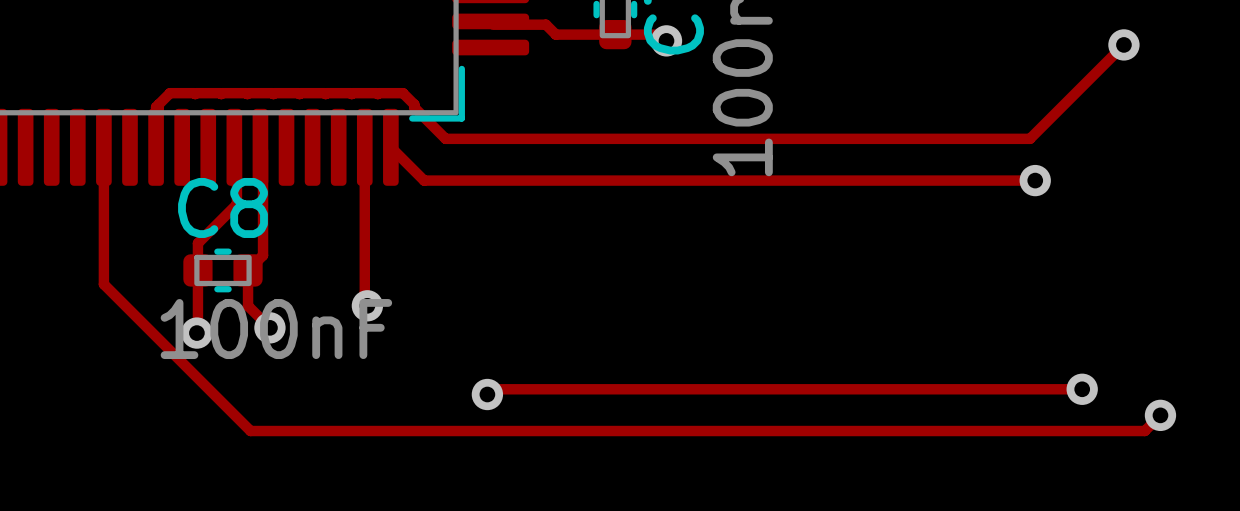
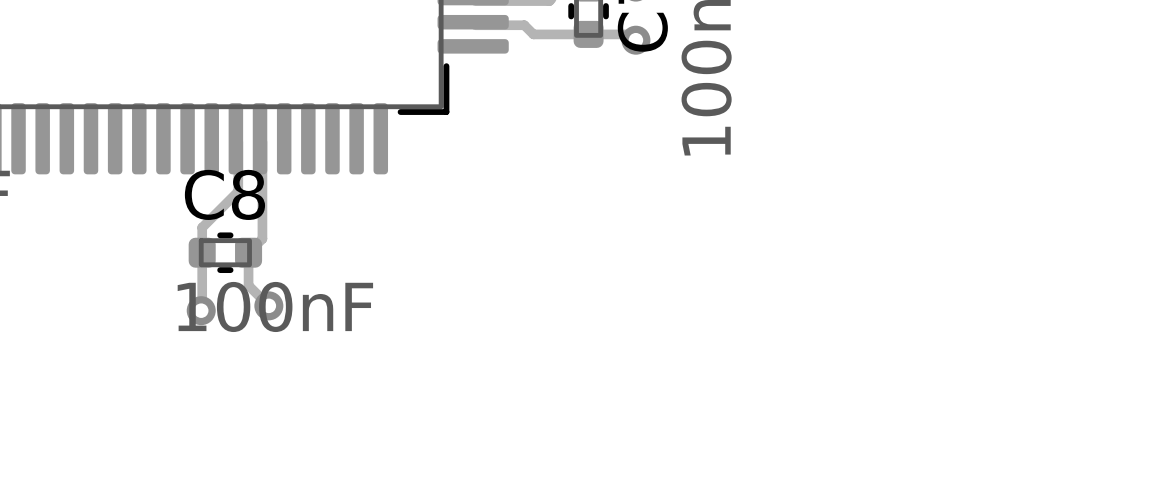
track: (1123, 44) (1030, 138) (445, 138) (414, 107) (414, 104) (402, 93) (170, 93) (158, 104) (158, 109) (156, 107) (156, 147) -> none
via: (1123, 44) -> none
track: (103, 147) (103, 284) (250, 431) (1144, 431) (1160, 415) -> none
track: (364, 147) (364, 292) (367, 295) (367, 305) (364, 303) -> none
track: (390, 147) (424, 180) (1035, 180) -> none
via: (1035, 180) -> none
via: (367, 305) -> none
track: (1082, 389) (492, 389) (487, 394) -> none
via: (1082, 389) -> none
via: (487, 394) -> none
via: (1160, 415) -> none

